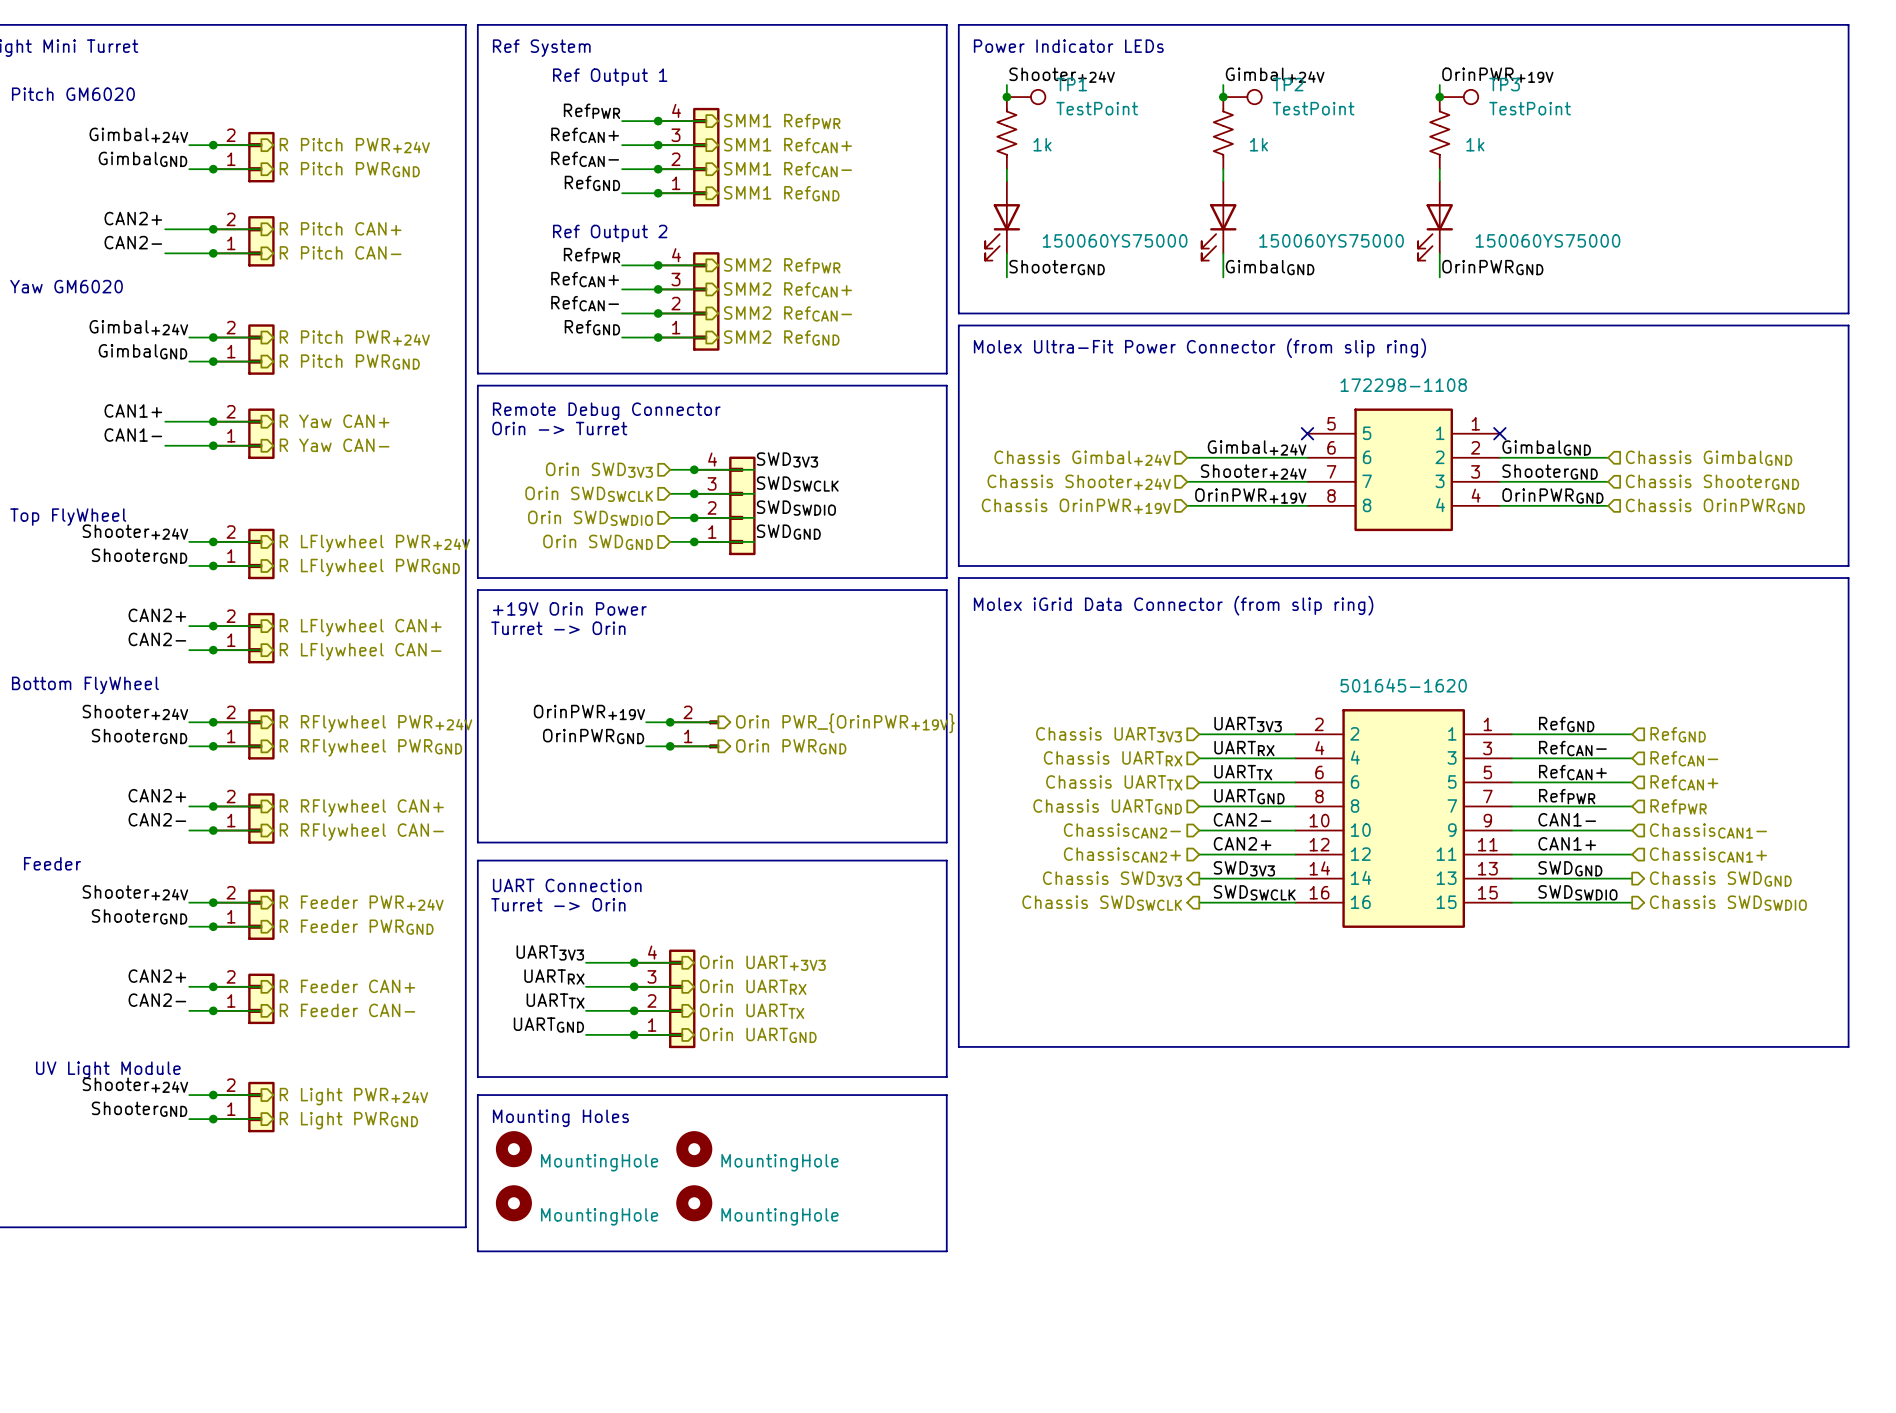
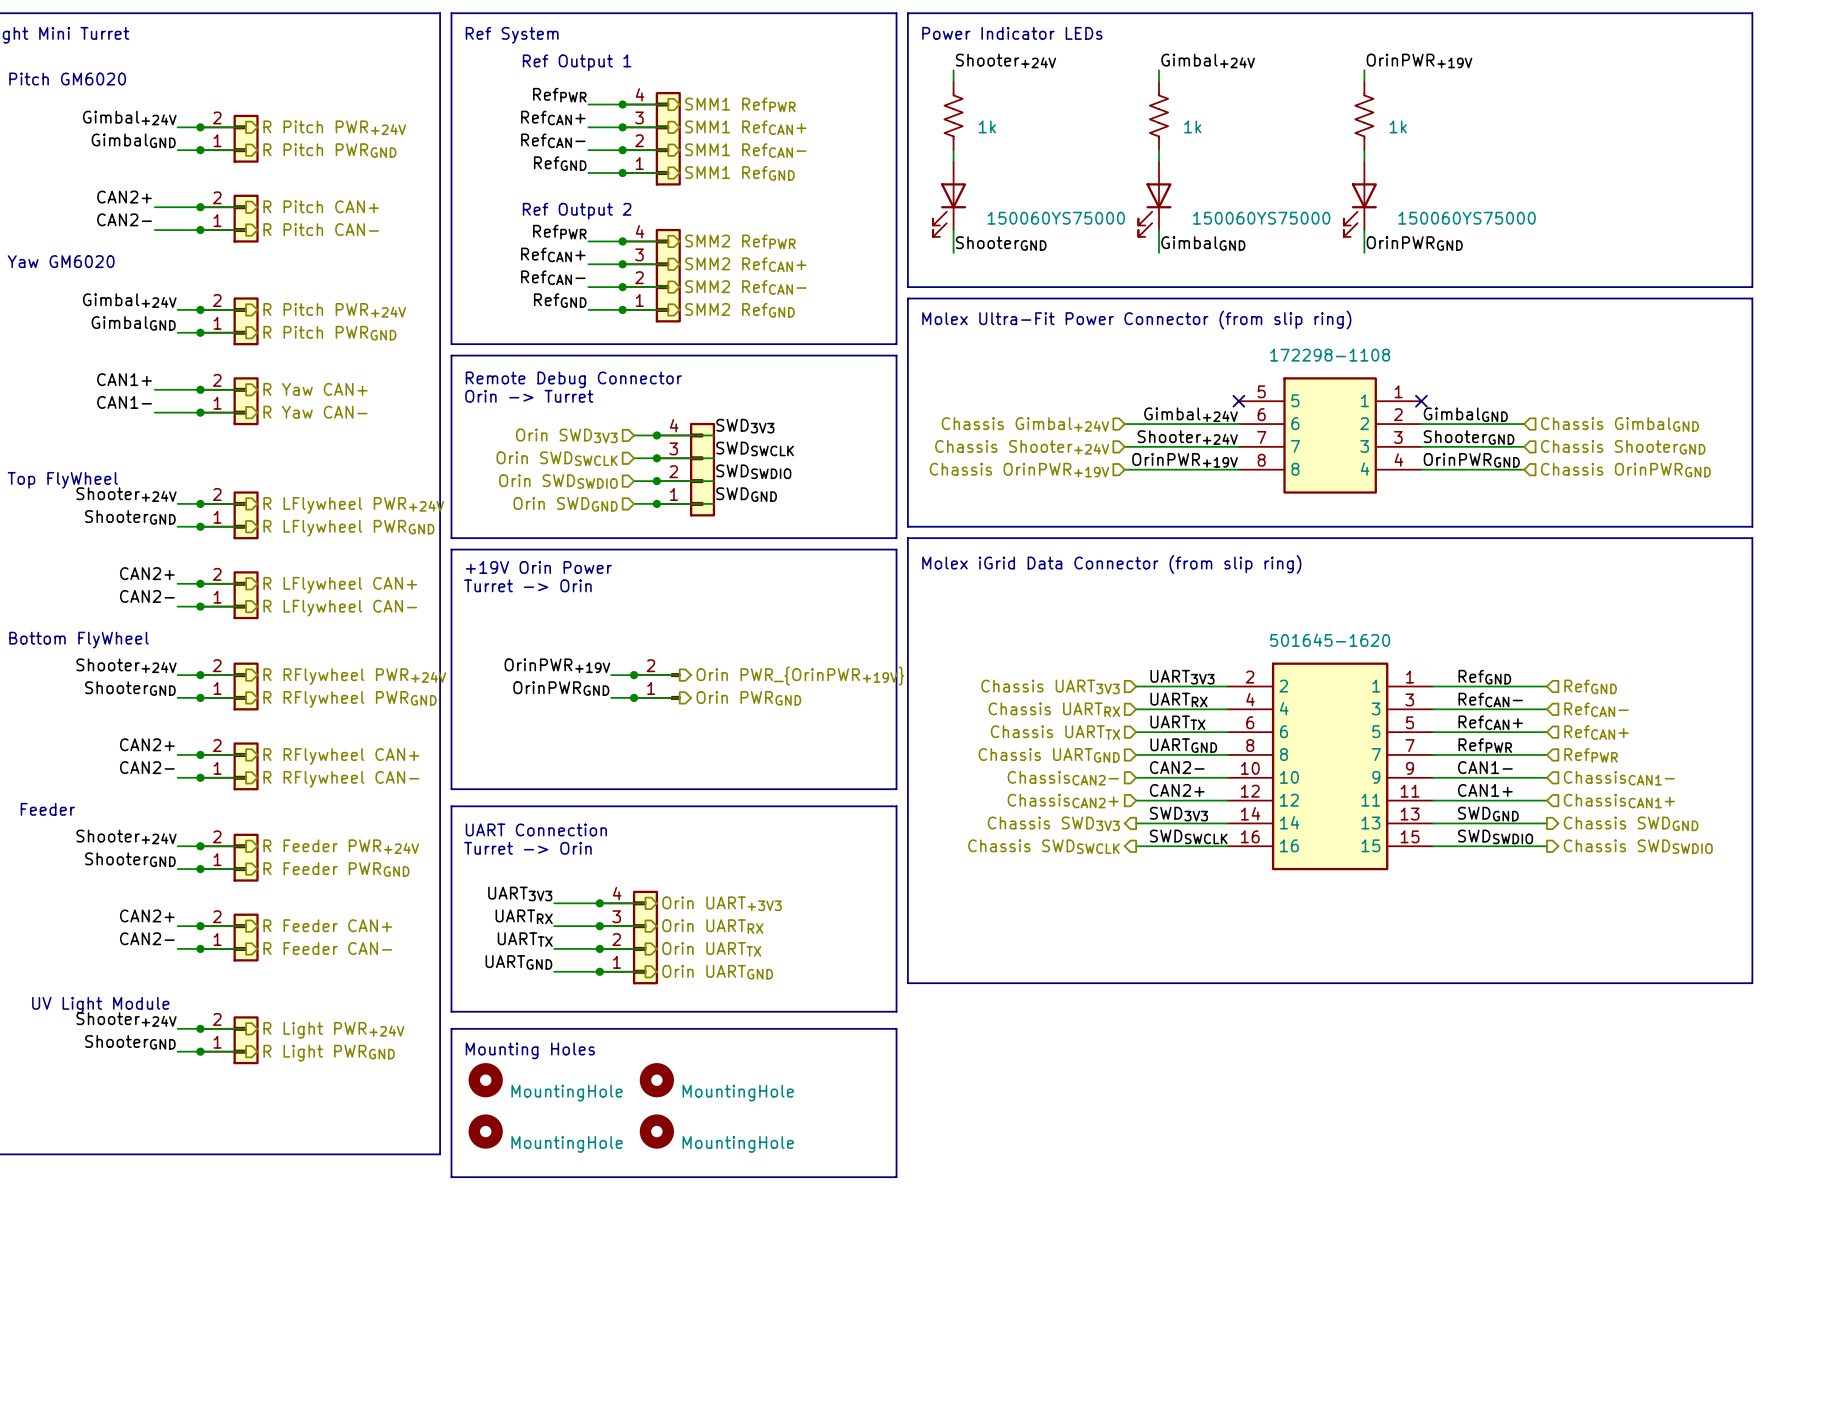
junction: (1006, 97) -> none
TP1: TestPoint (1026, 97) -> none
junction: (1223, 97) -> none
TP2: TestPoint (1242, 97) -> none
junction: (1439, 97) -> none
TP3: TestPoint (1459, 97) -> none

